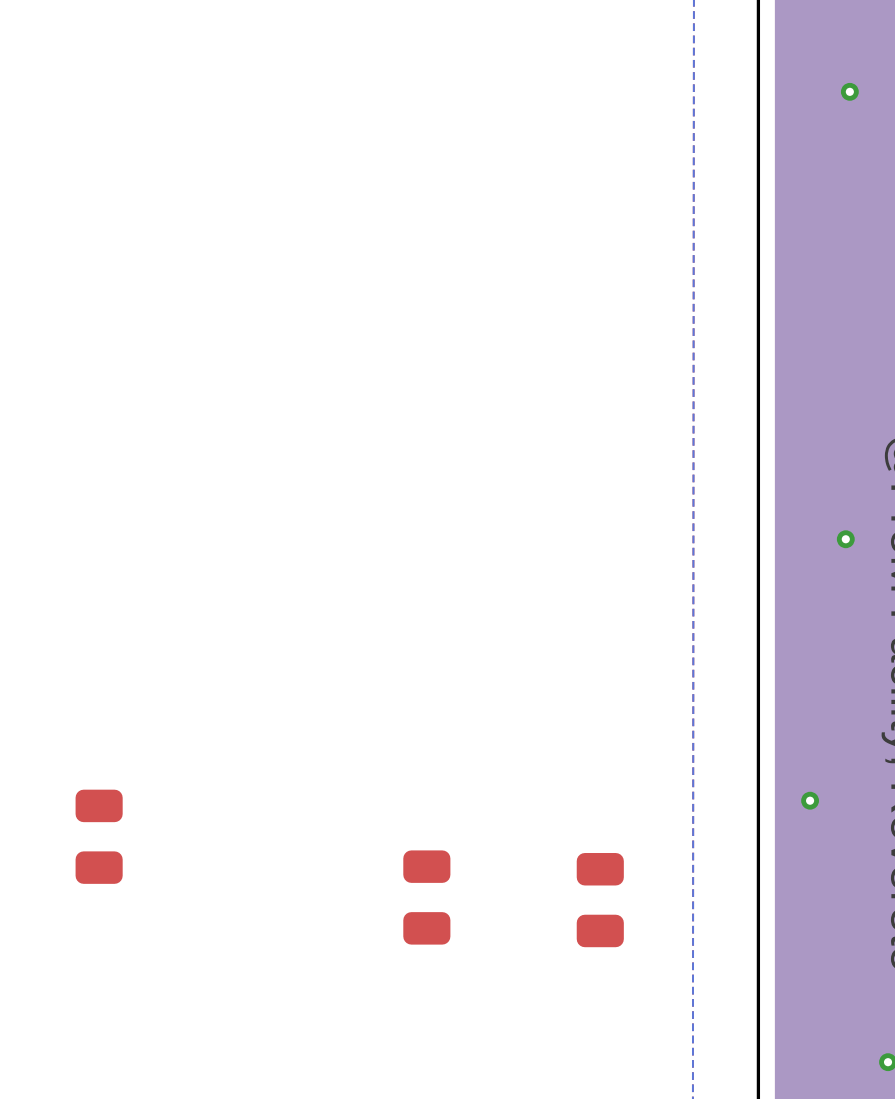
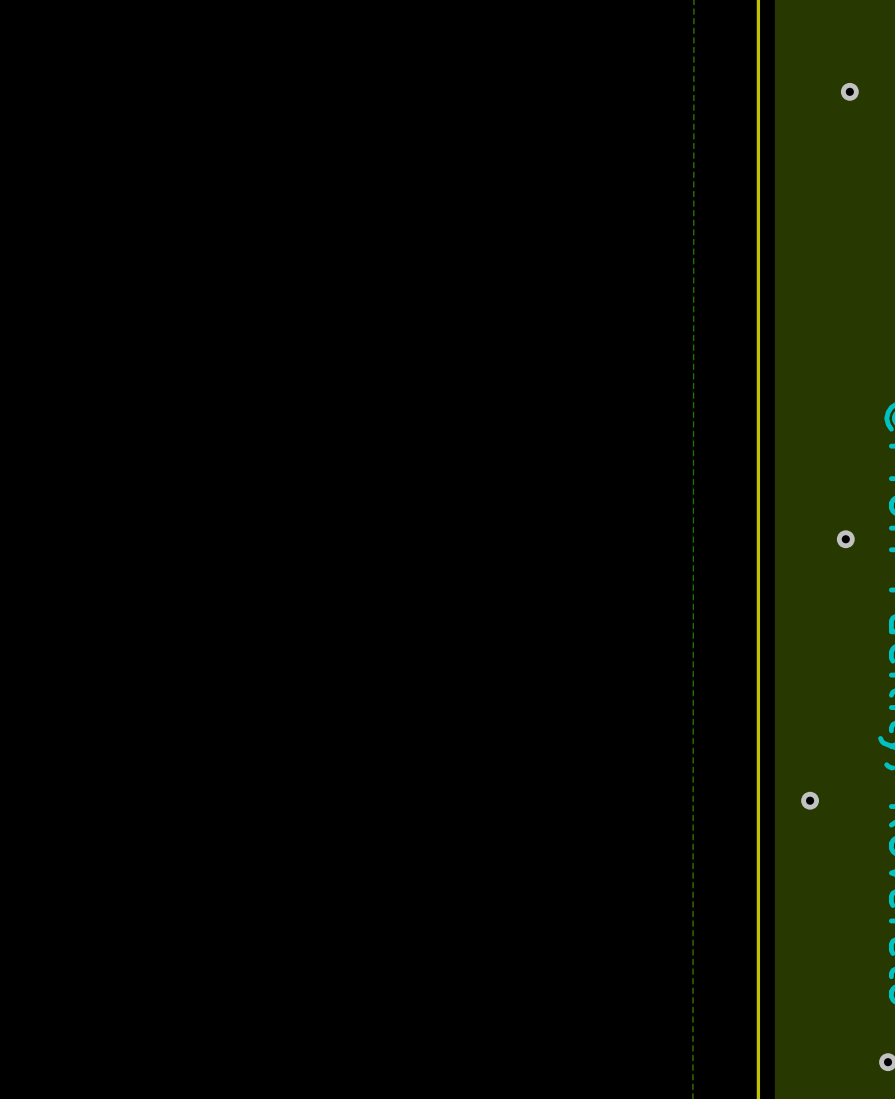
part: (99, 836) -> none
part: (426, 897) -> none
part: (600, 900) -> none

